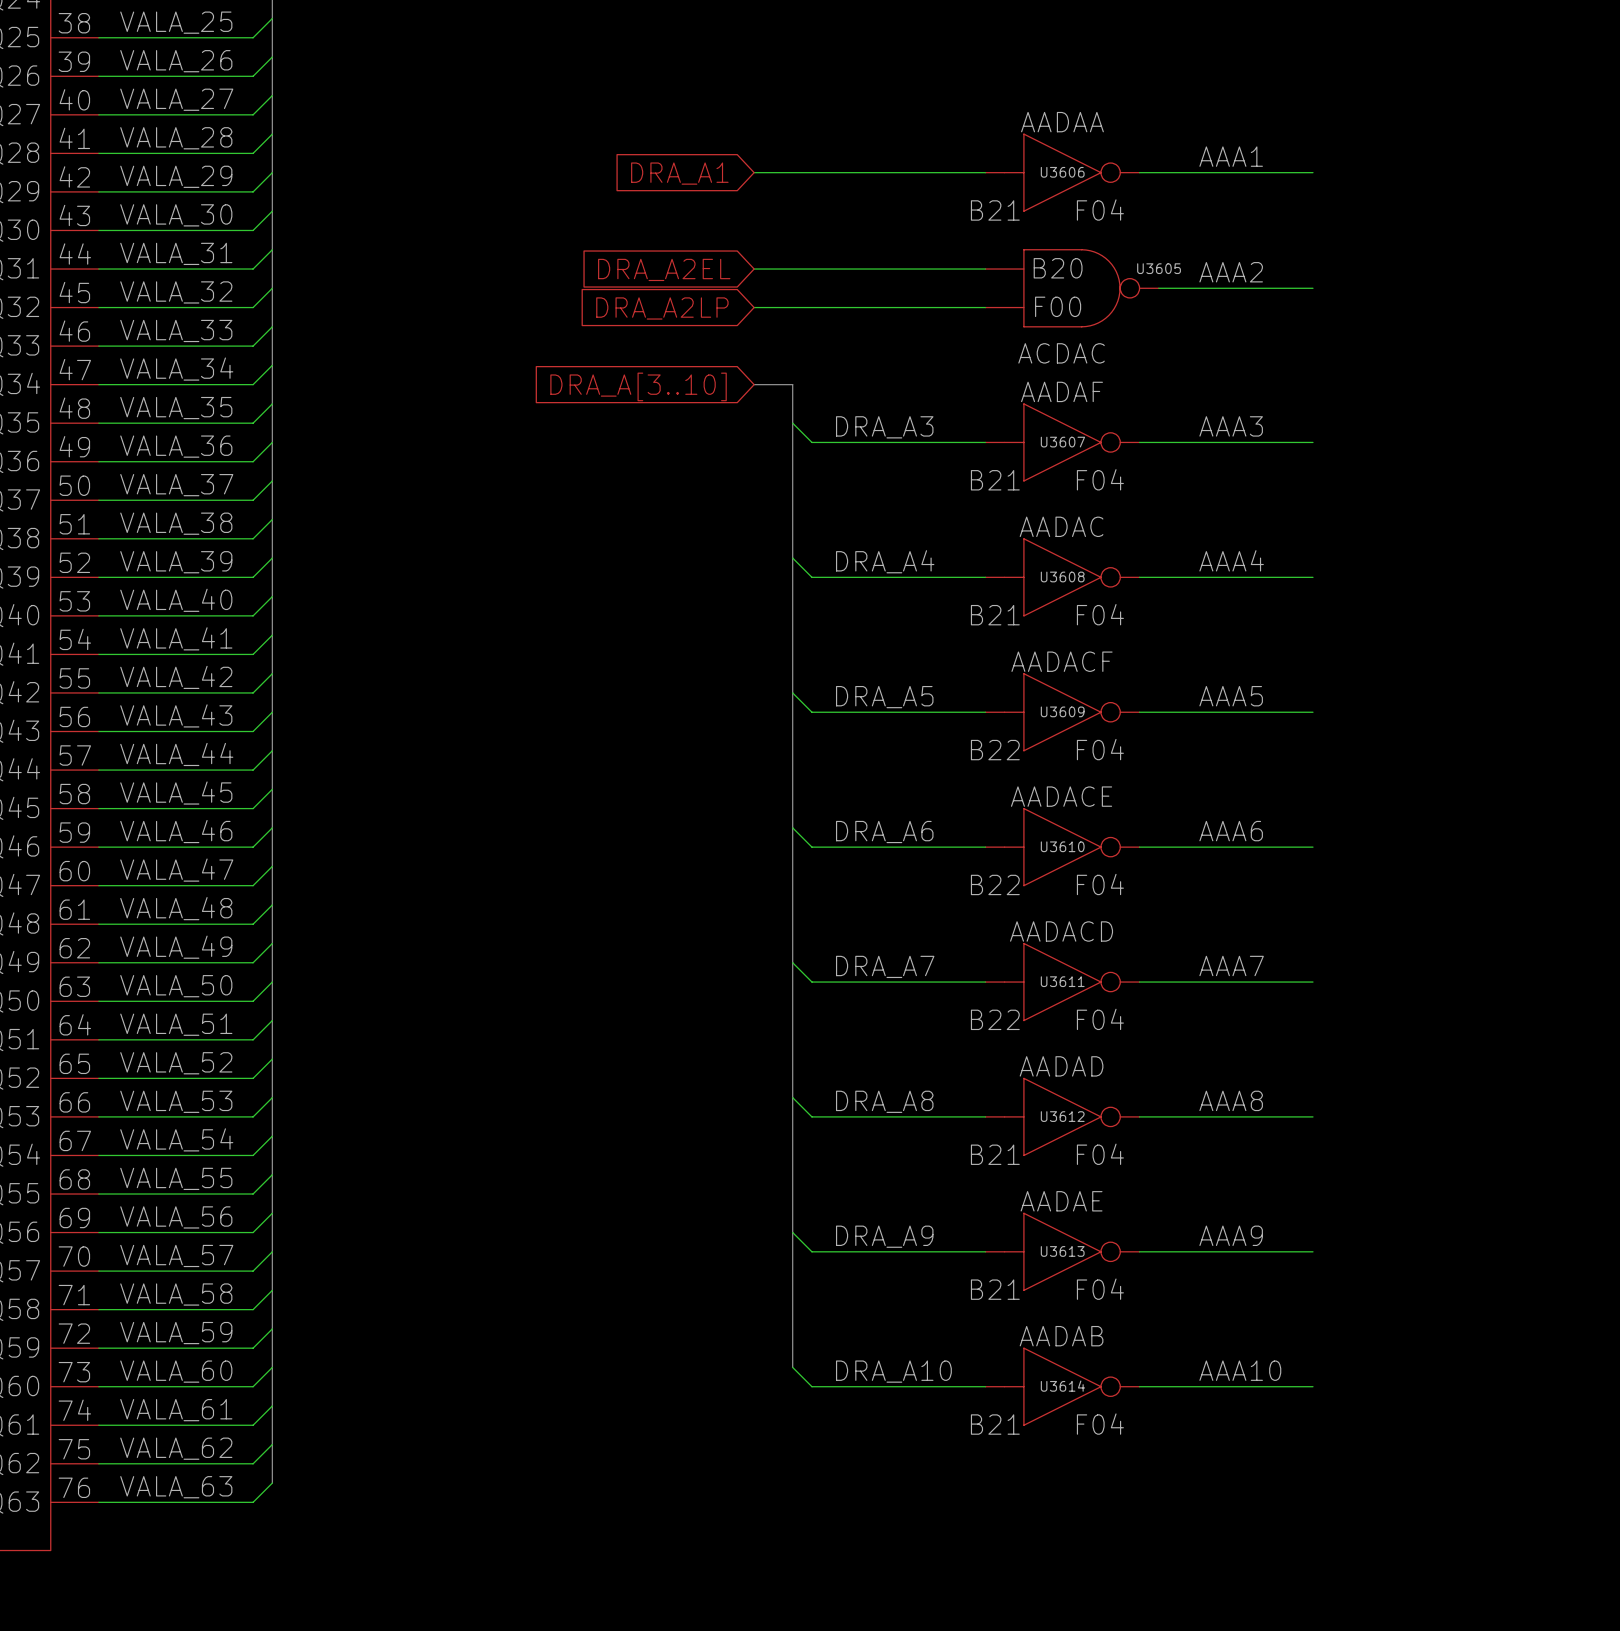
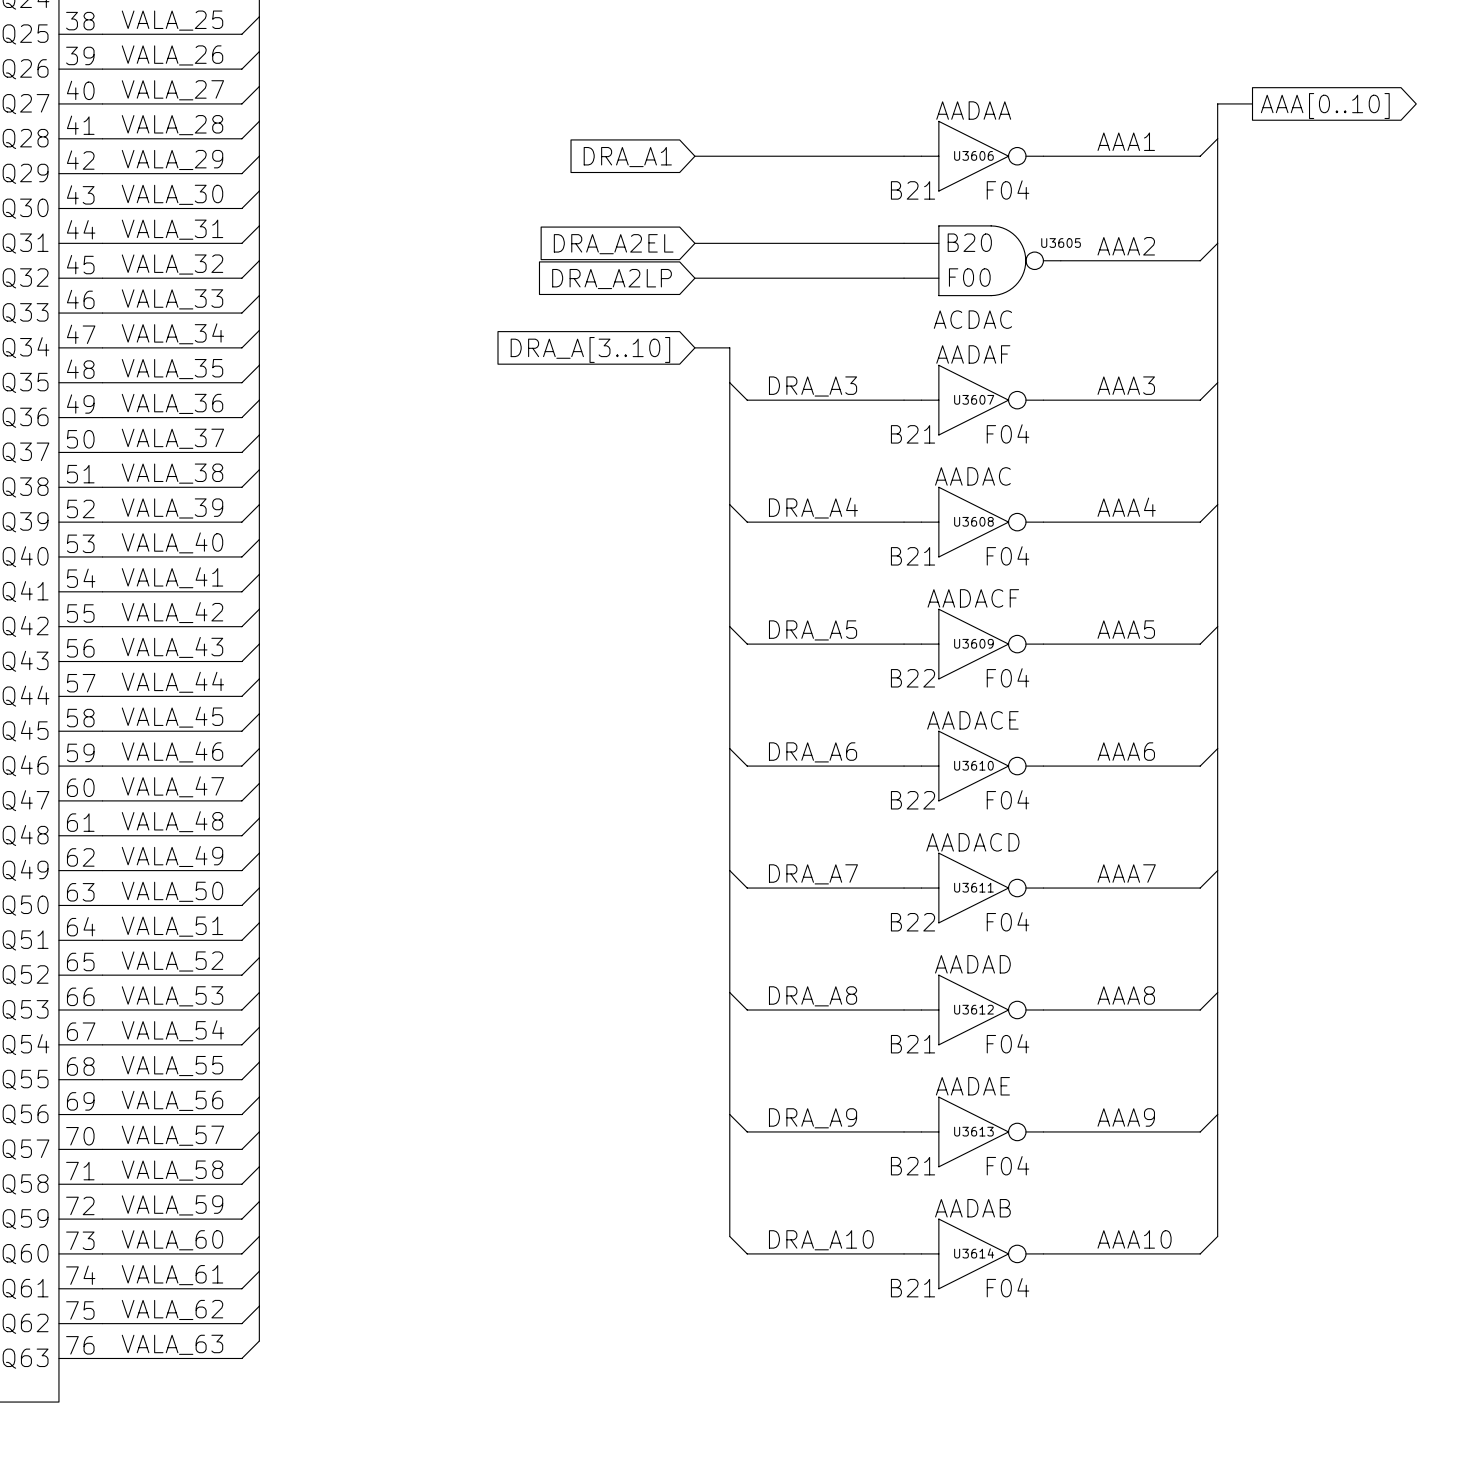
bus: none -> (1252, 103) (1217, 103) (1217, 1236)
global label: none -> AAA[0..10] (1325, 106)
wire: none -> (1217, 138) (1200, 156)
wire: none -> (1217, 243) (1200, 260)
wire: none -> (1217, 382) (1200, 400)
wire: none -> (1217, 504) (1200, 522)
wire: none -> (1217, 626) (1200, 644)
wire: none -> (1217, 748) (1200, 766)
wire: none -> (1217, 870) (1200, 888)
wire: none -> (1217, 992) (1200, 1010)
wire: none -> (1217, 1114) (1200, 1131)
wire: none -> (1217, 1236) (1200, 1253)

